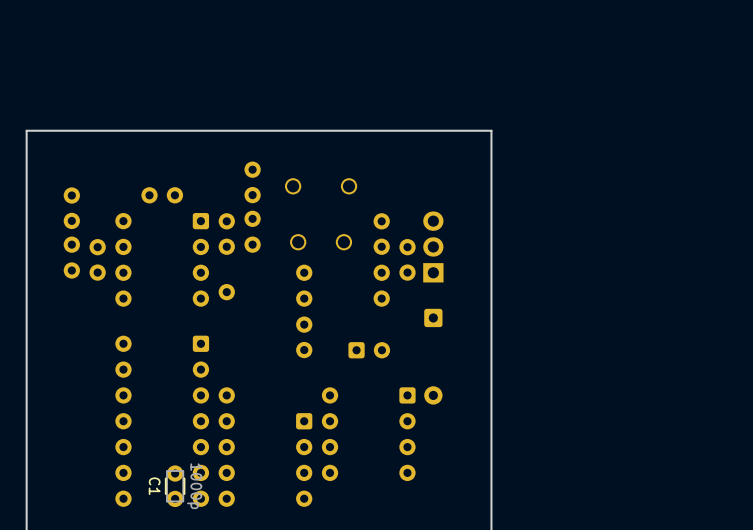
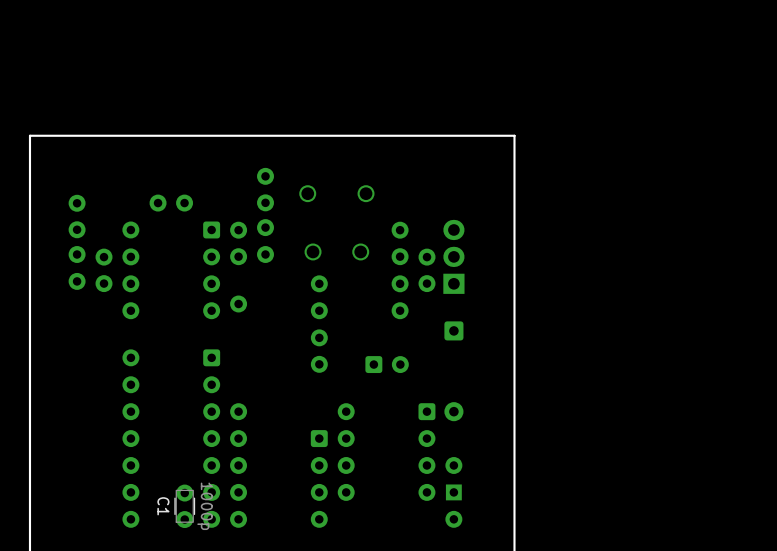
part: none -> (453, 492)

